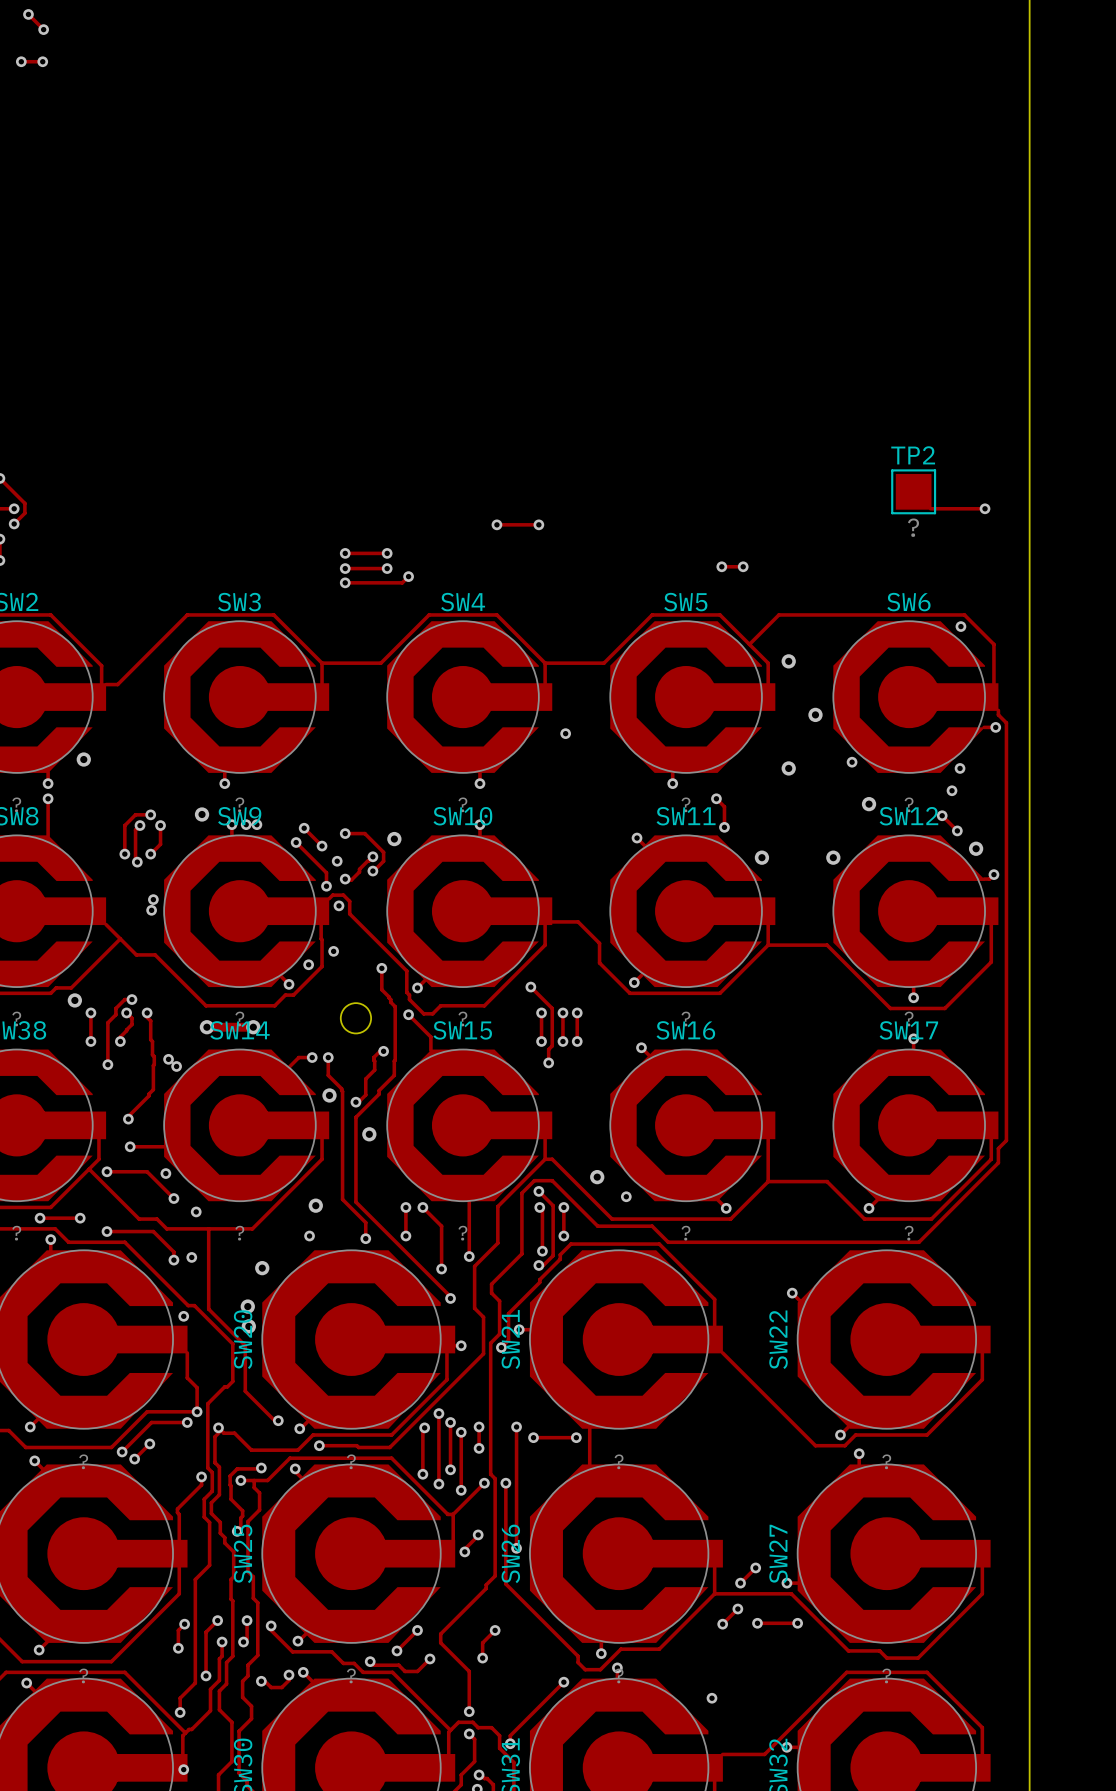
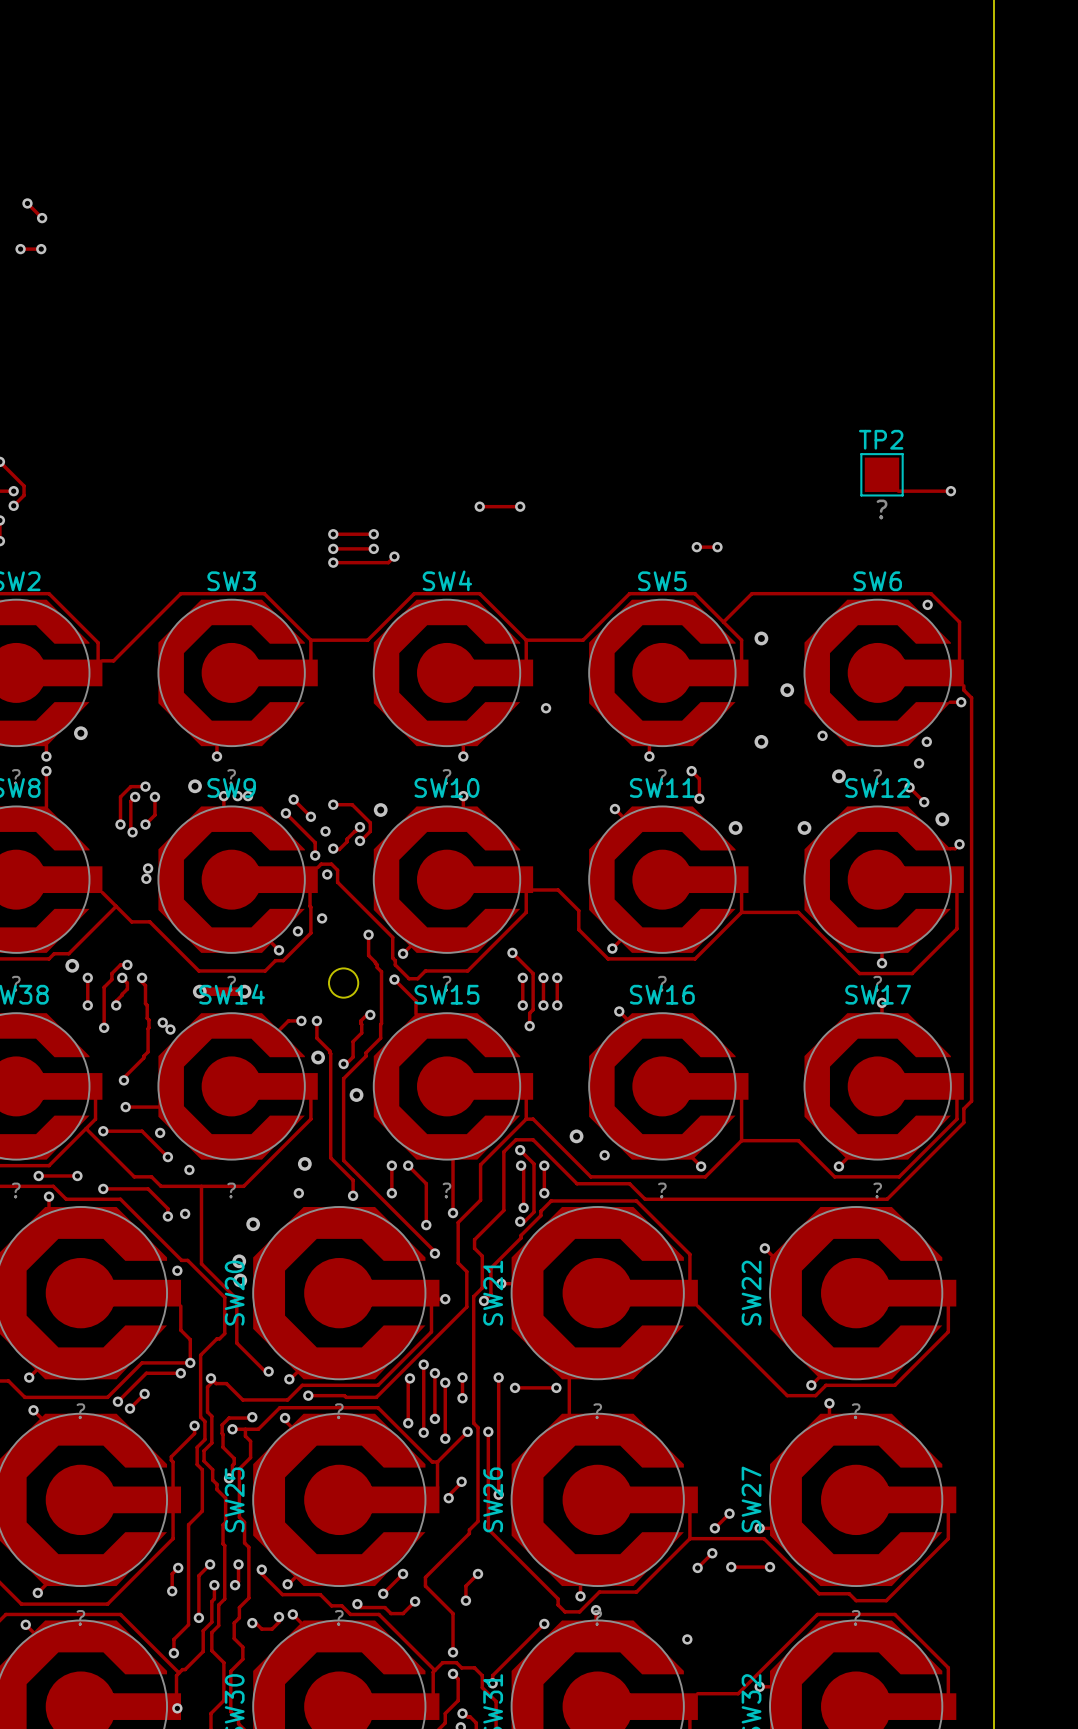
track: (28, 14) (43, 29) -> (27, 203) (42, 218)
via: (28, 14) -> none
via: (43, 29) -> none
track: (21, 61) (42, 61) -> (20, 249) (41, 249)
via: (21, 61) -> none
via: (42, 61) -> none
via: none -> (27, 203)
via: none -> (42, 218)
via: none -> (20, 249)
via: none -> (41, 249)

